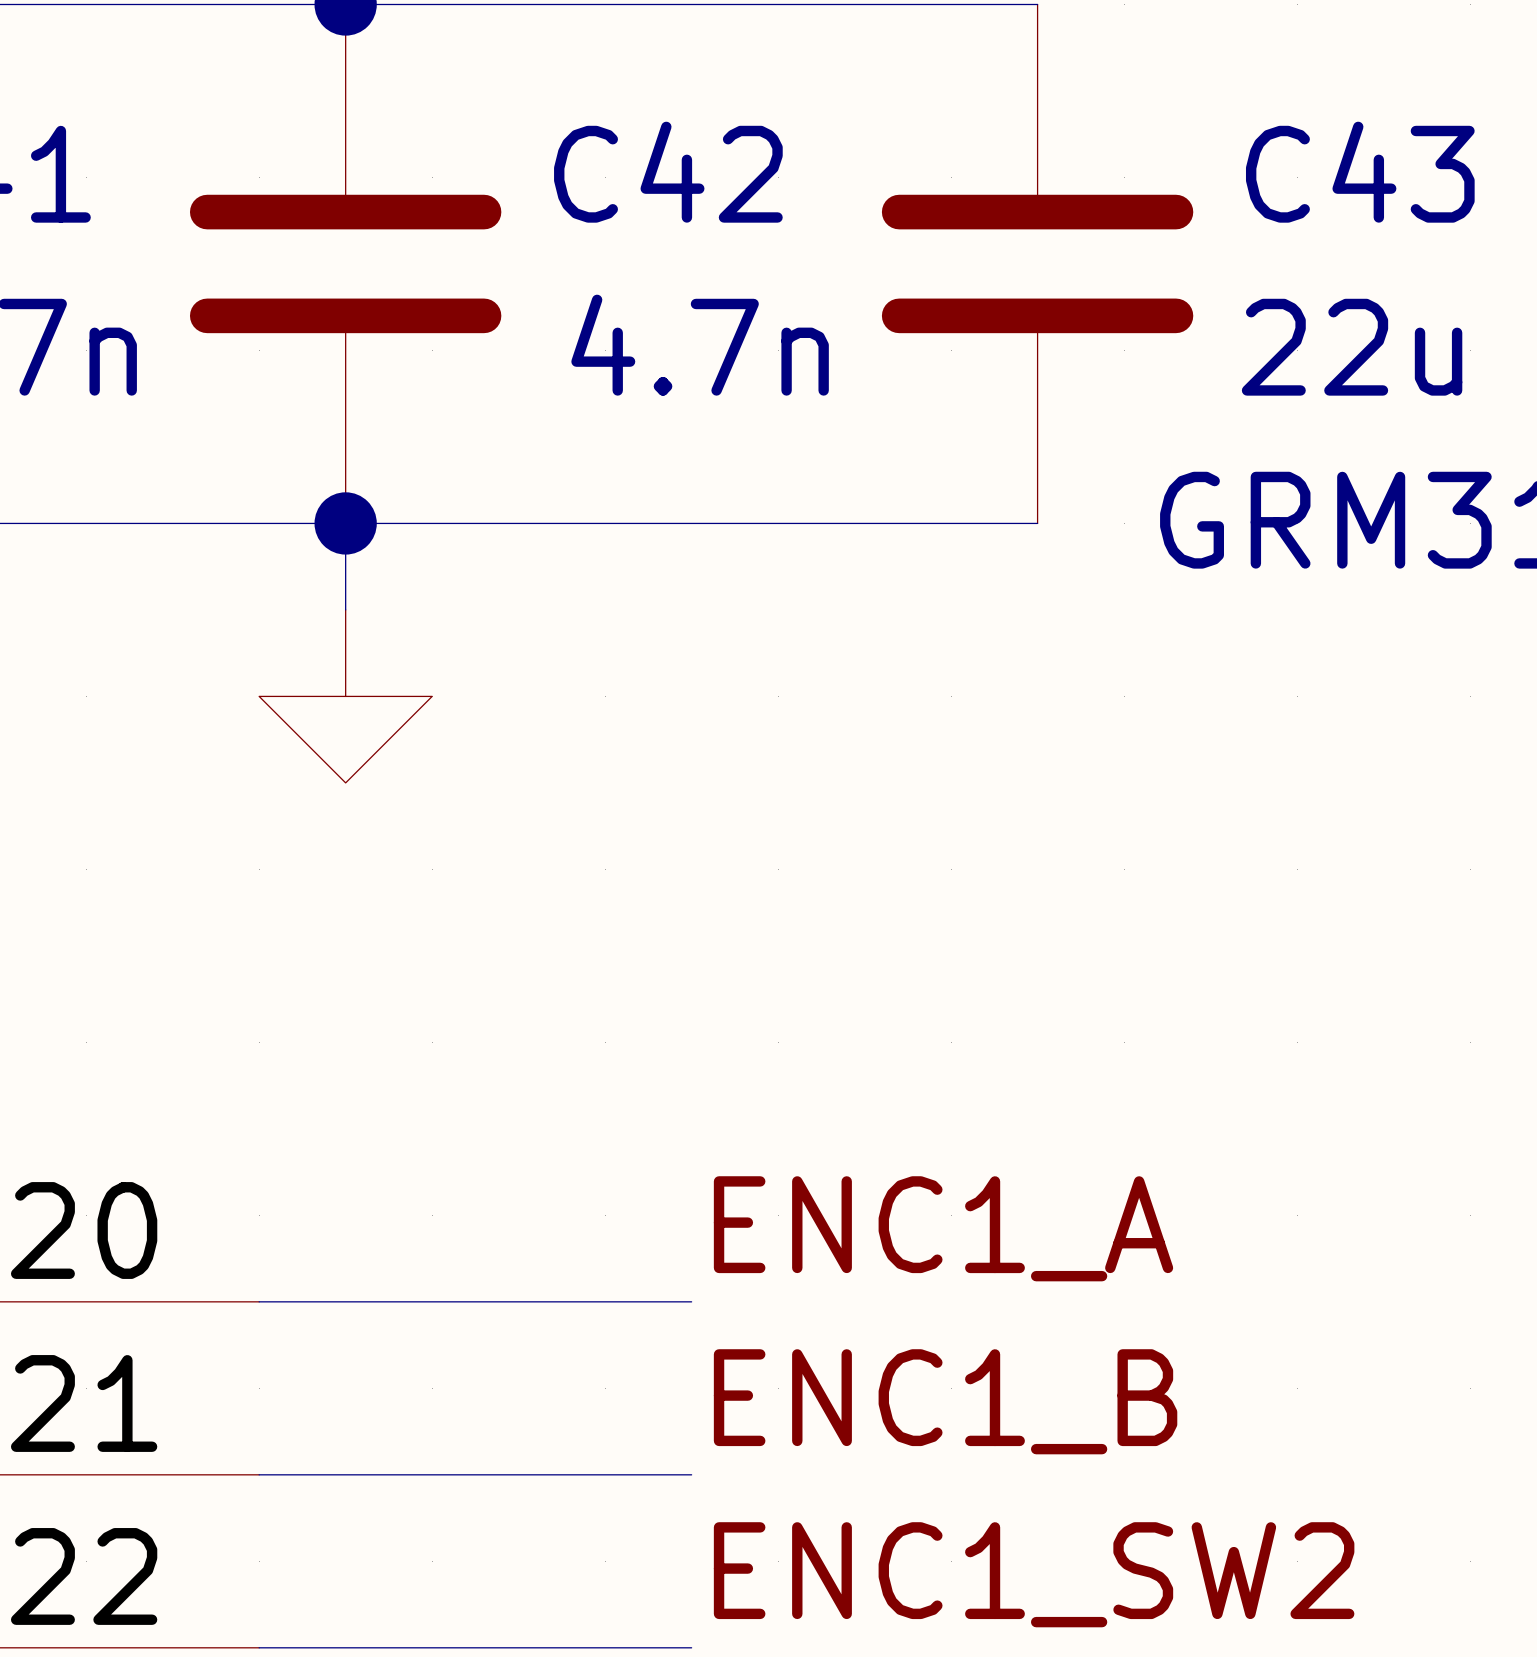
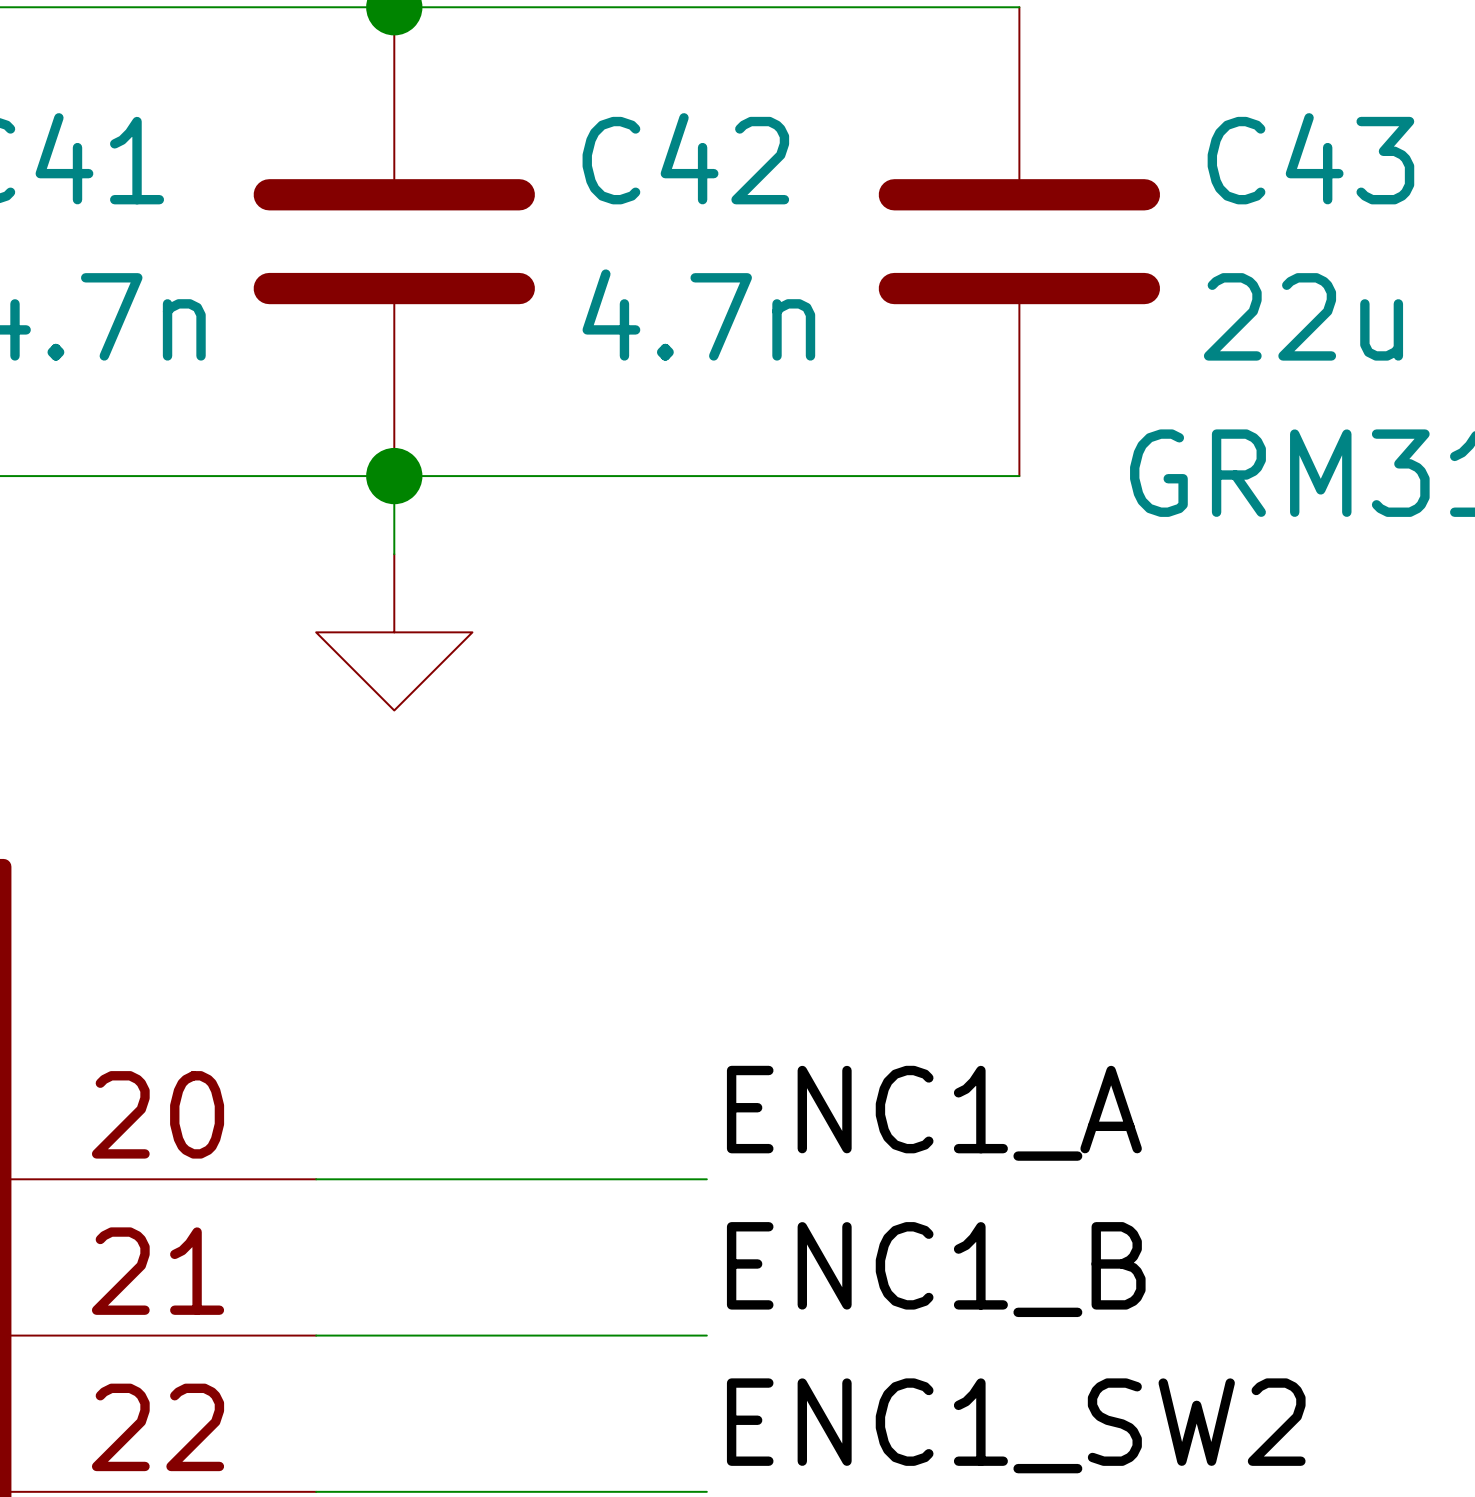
C42 value position: 4.7n (700, 345) -> 4.7n (698, 315)

